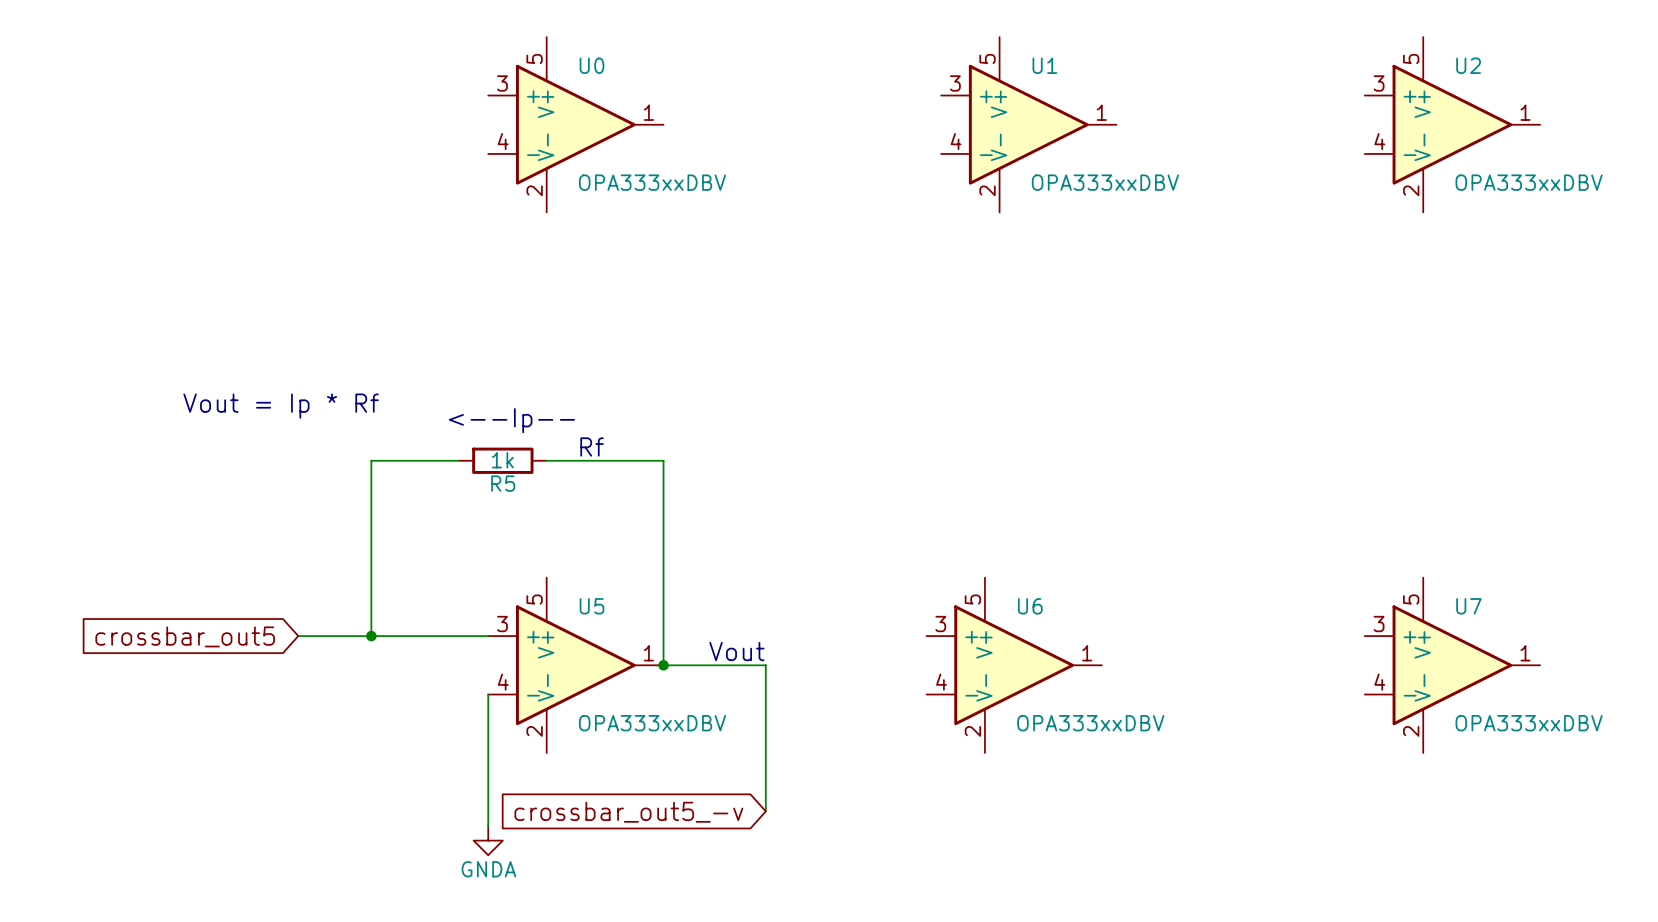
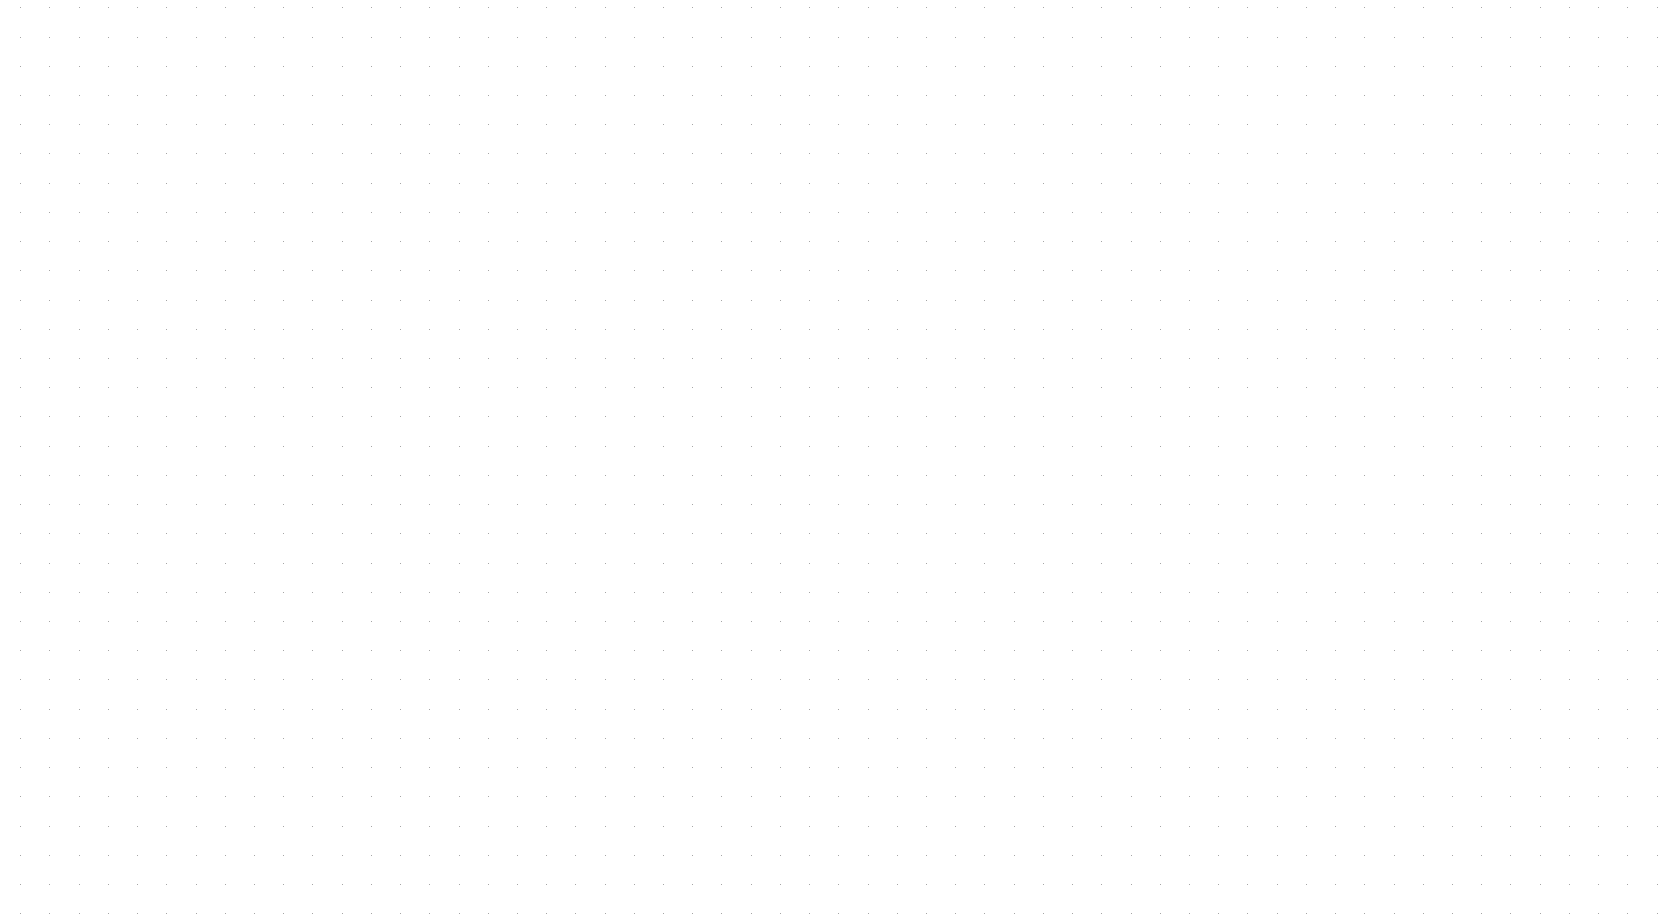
U0: OPA333xxDBV (575, 124) -> none
U1: OPA333xxDBV (1028, 124) -> none
U2: OPA333xxDBV (1452, 124) -> none
text: Vout = Ip * Rf (281, 406) -> none
text: <--Ip-- (511, 420) -> none
text: Rf (592, 446) -> none
wire: (459, 460) (371, 460) (371, 636) -> none
R5: 1k (502, 460) -> none
wire: (546, 460) (663, 460) (663, 665) (765, 665) (765, 811) -> none
global label: crossbar_out5 (185, 636) -> none
wire: (298, 636) (488, 636) -> none
junction: (371, 636) -> none
text: Vout (736, 651) -> none
U5: OPA333xxDBV (575, 665) -> none
junction: (663, 665) -> none
U6: OPA333xxDBV (1014, 665) -> none
U7: OPA333xxDBV (1452, 665) -> none
wire: (488, 694) (488, 826) -> none
global label: crossbar_out5_-v (628, 812) -> none
power symbol: GNDA (488, 840) -> none

